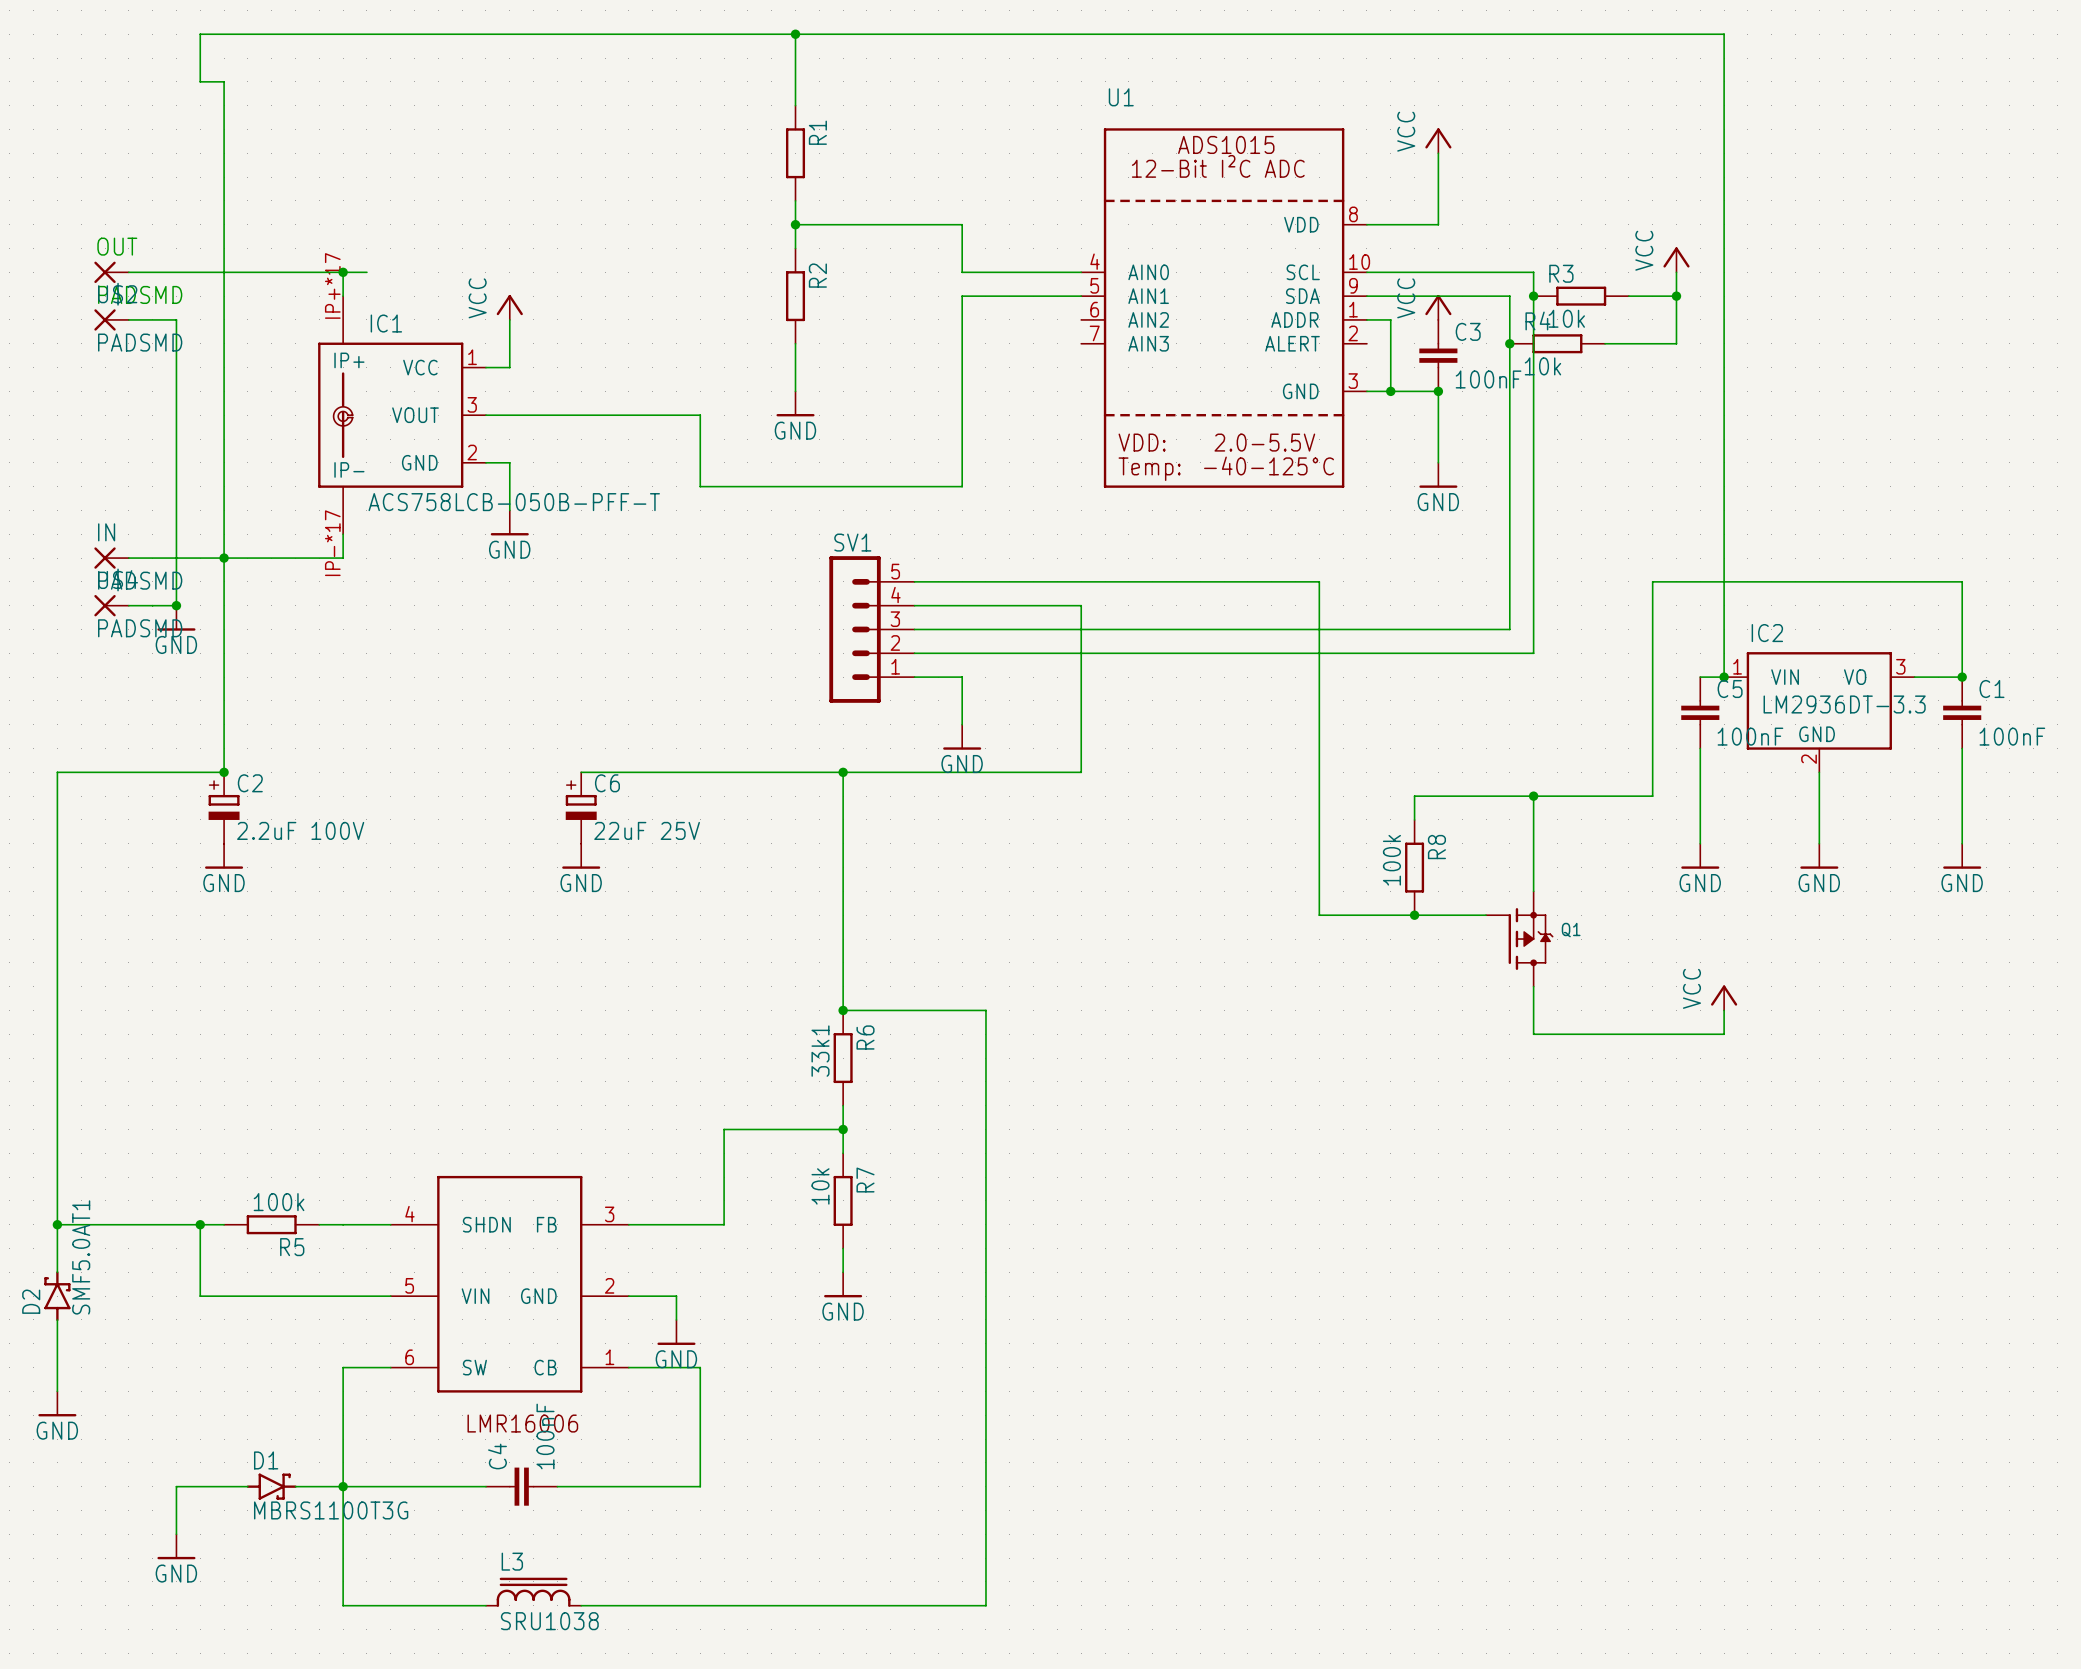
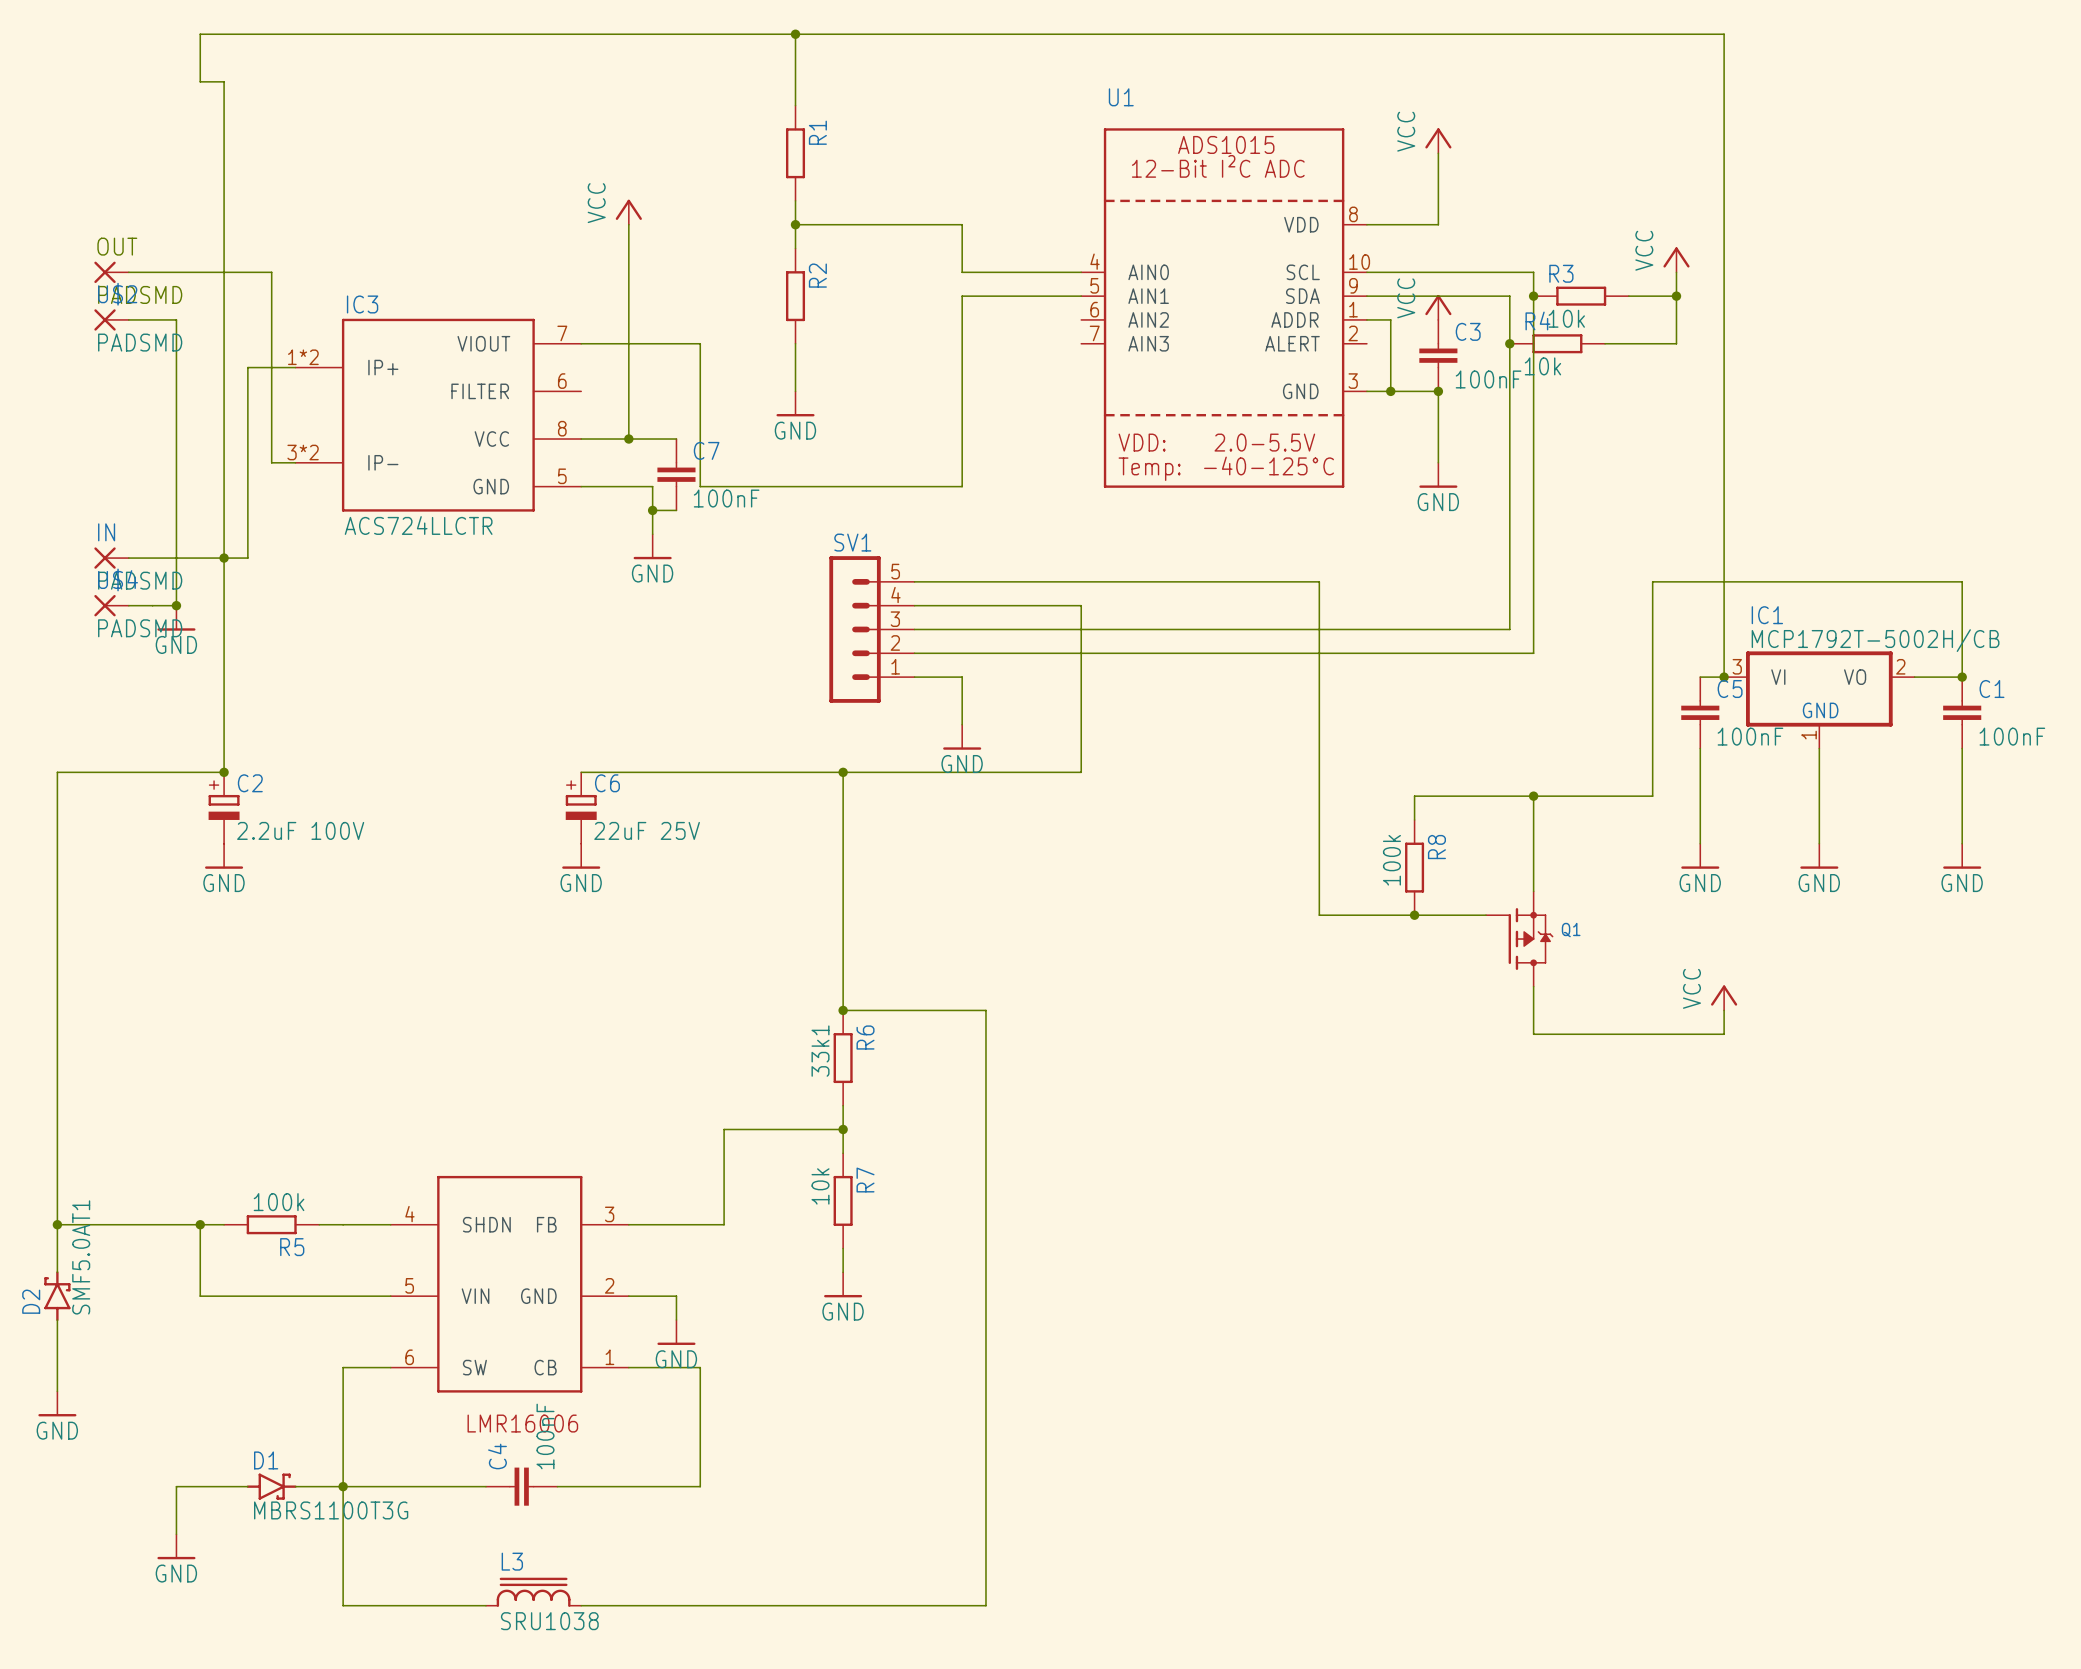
wire: none -> (628, 224) (628, 439)
wire: (271, 272) (366, 272) -> (271, 272) (271, 462) (295, 462)
wire: (343, 272) (343, 296) -> none
junction: (343, 272) -> none
IC1 symbol: [318, 296, 486, 535] -> [1724, 651, 1915, 749]
power symbol position: VCC (509, 307) -> VCC (628, 212)
wire: (509, 319) (509, 367) (485, 367) -> none
IC1 name position: IC1 (386, 323) -> IC1 (1767, 615)
IC3: none -> ACS724LLCTR (438, 415)
wire: (485, 415) (700, 415) -> (581, 343) (700, 343) (700, 415)
wire: none -> (581, 439) (676, 439)
junction: none -> (628, 439)
wire: (485, 462) (509, 462) (509, 510) -> none
C7: none -> 100nF (676, 474)
wire: none -> (581, 486) (652, 486) (652, 534)
IC1 value: ACS758LCB-050B-PFF-T (514, 502) -> MCP1792T-5002H/CB (1875, 640)
wire: none -> (652, 510) (676, 510)
junction: none -> (652, 510)
power symbol position: GND (509, 522) -> GND (652, 546)
wire: (343, 534) (343, 558) (247, 558) -> (295, 367) (247, 367) (247, 558)
IC2: LM2936DT-3.3 (1819, 712) -> none

